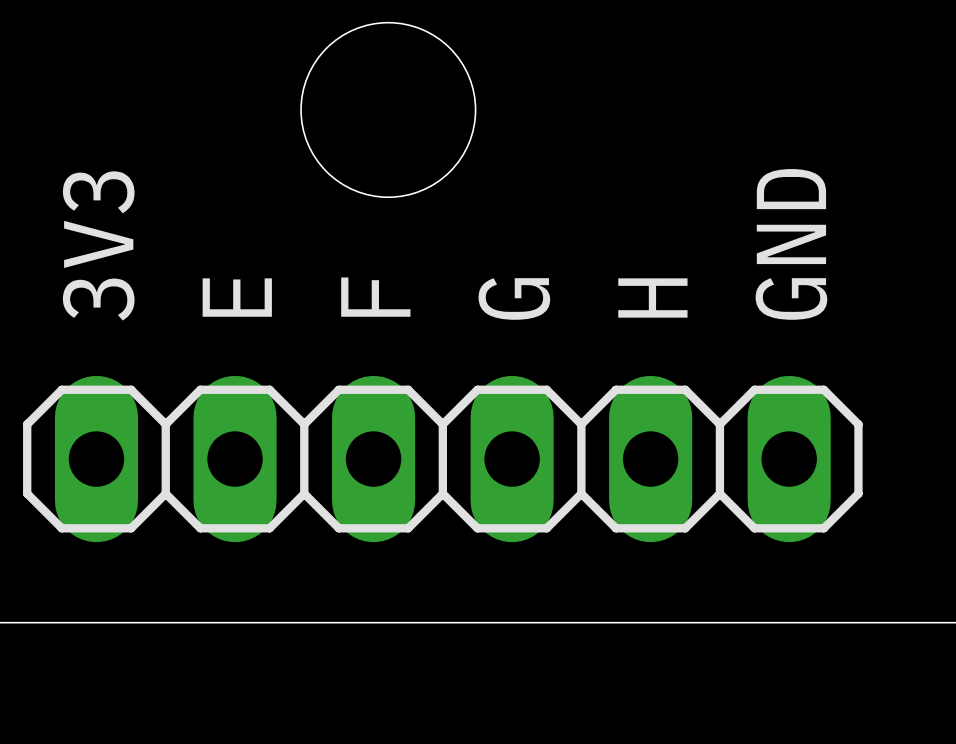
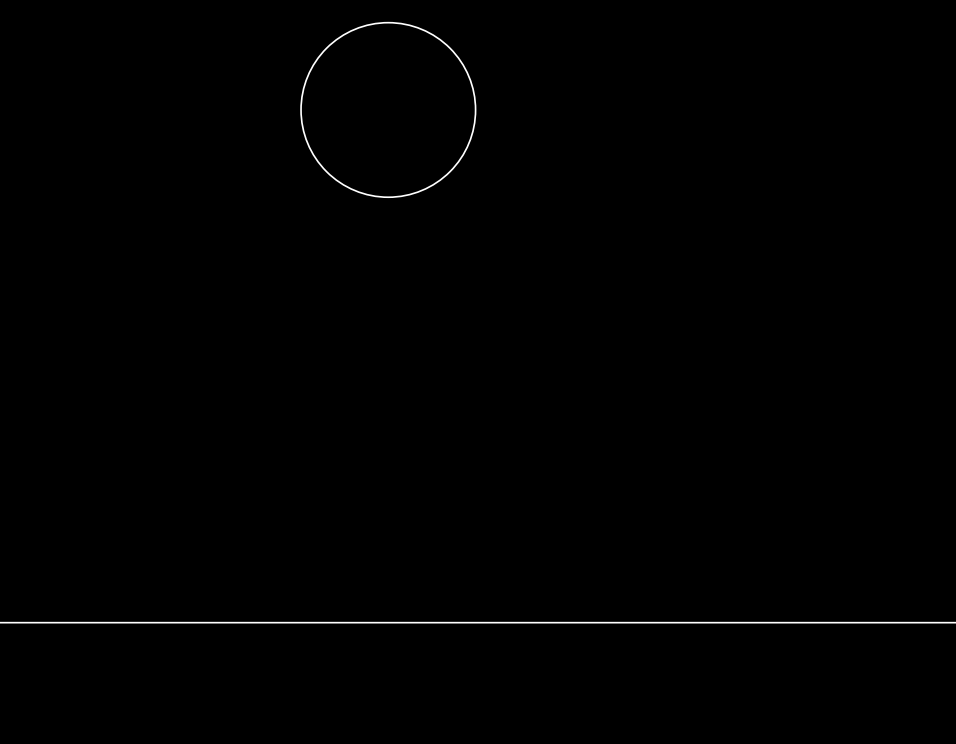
text: GND (791, 244) -> none
text: 3V3 (98, 245) -> none
text: E (237, 297) -> none
text: F (375, 297) -> none
text: G (514, 298) -> none
text: H (652, 298) -> none
part: (442, 459) -> none

